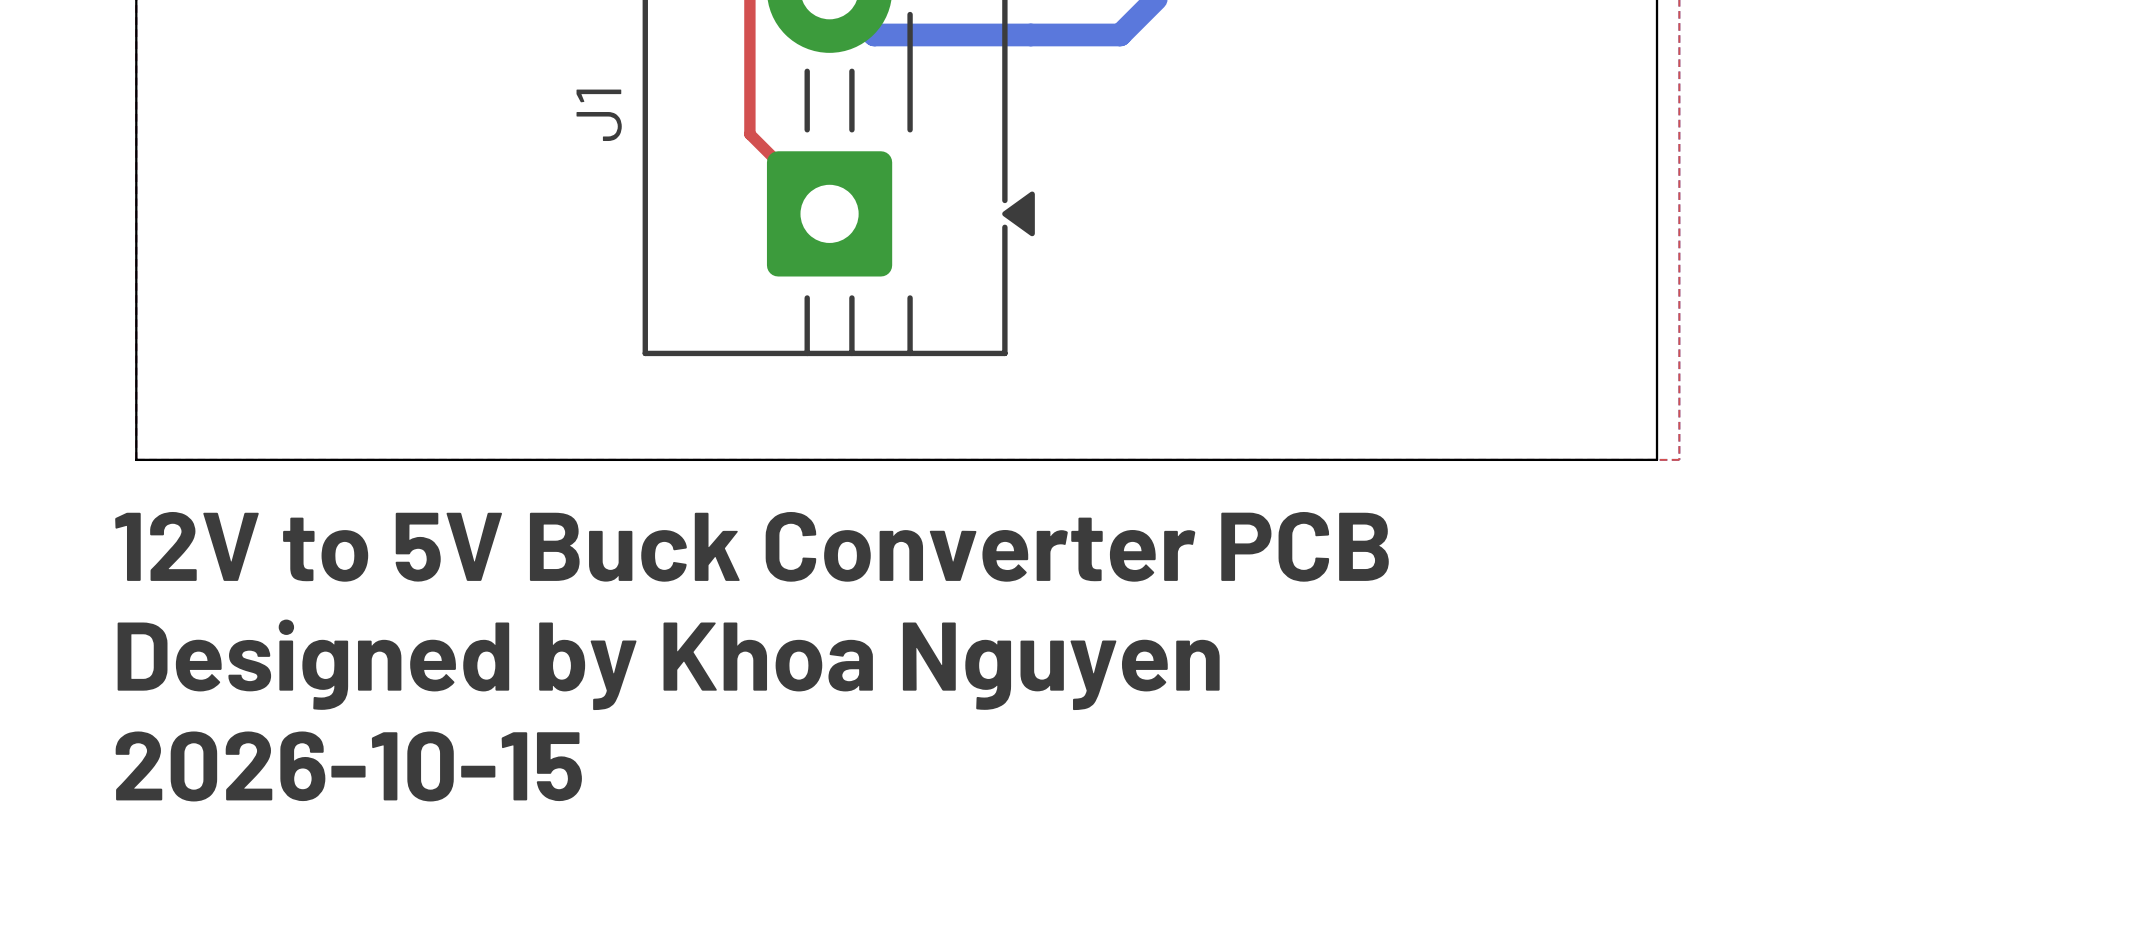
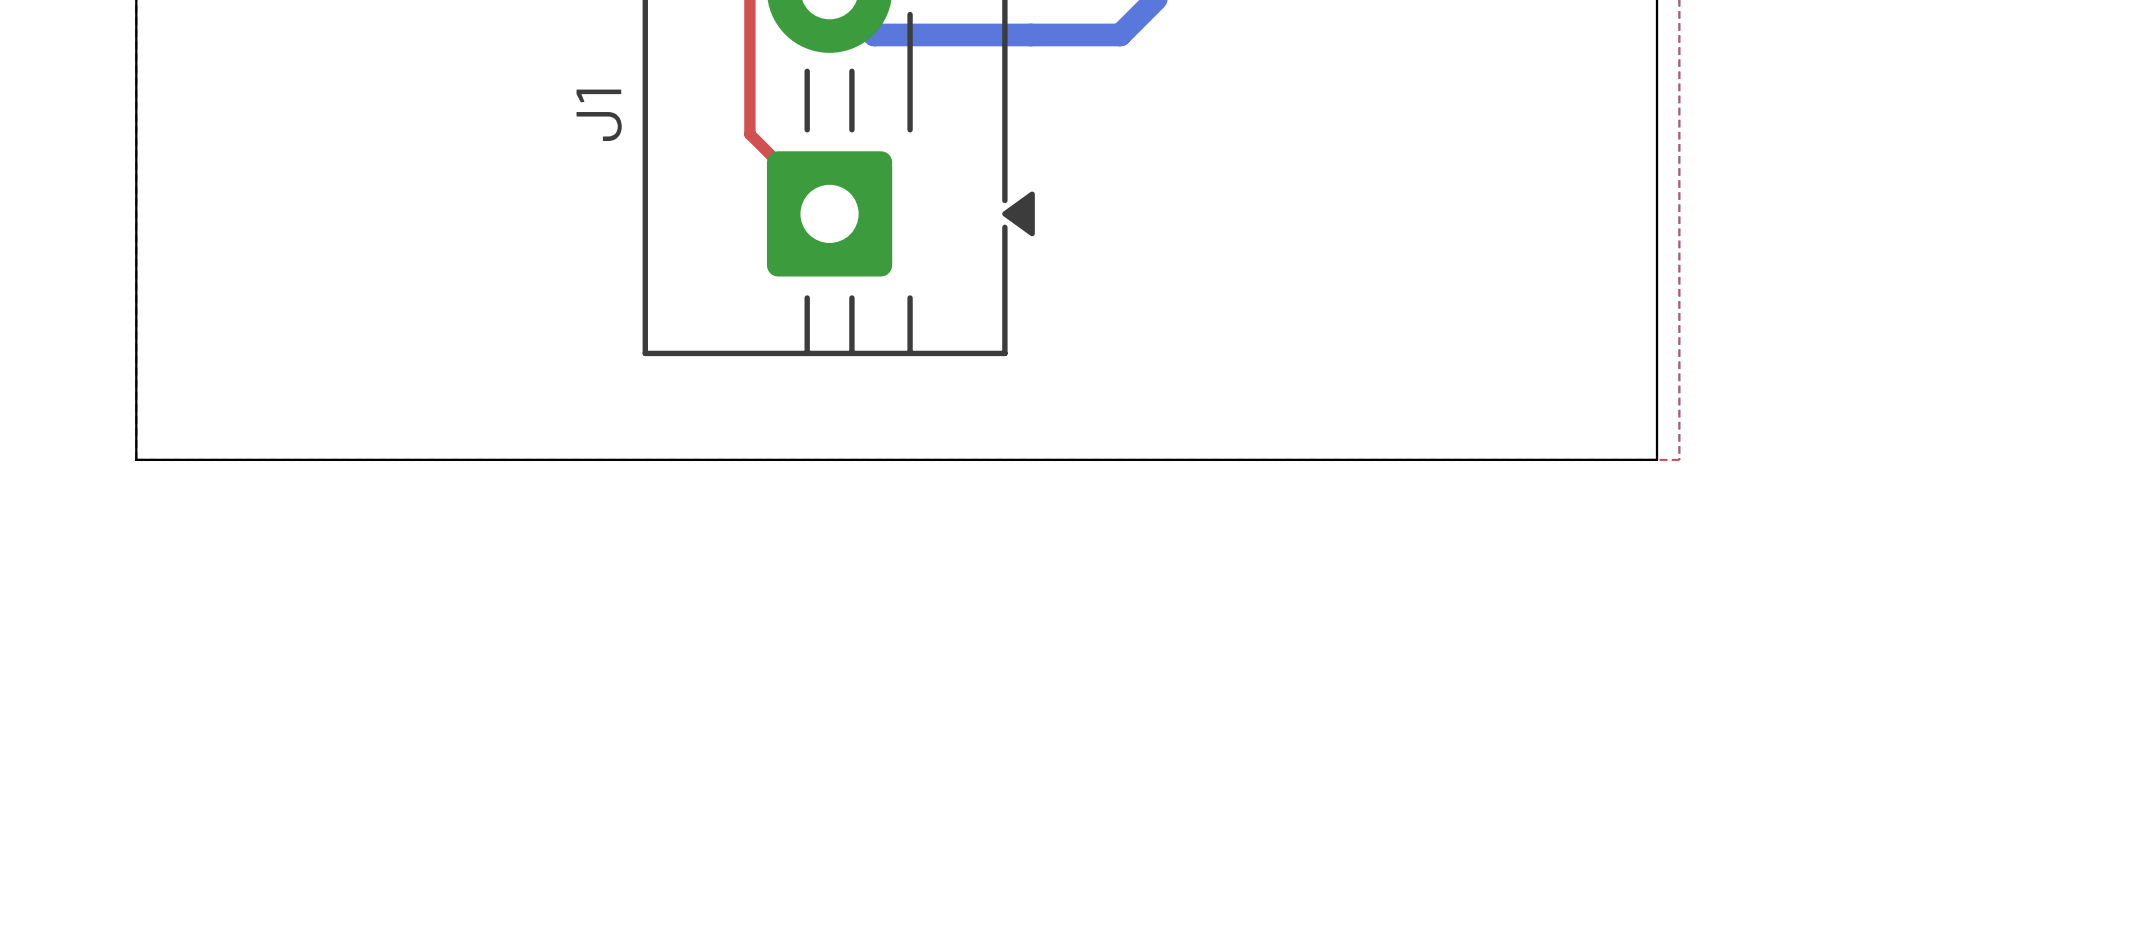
text: 12V to 5V Buck Converter PCB (751, 546) -> none
text: Designed by Khoa Nguyen (668, 664) -> none
text: 2026-10-15 (348, 766) -> none

